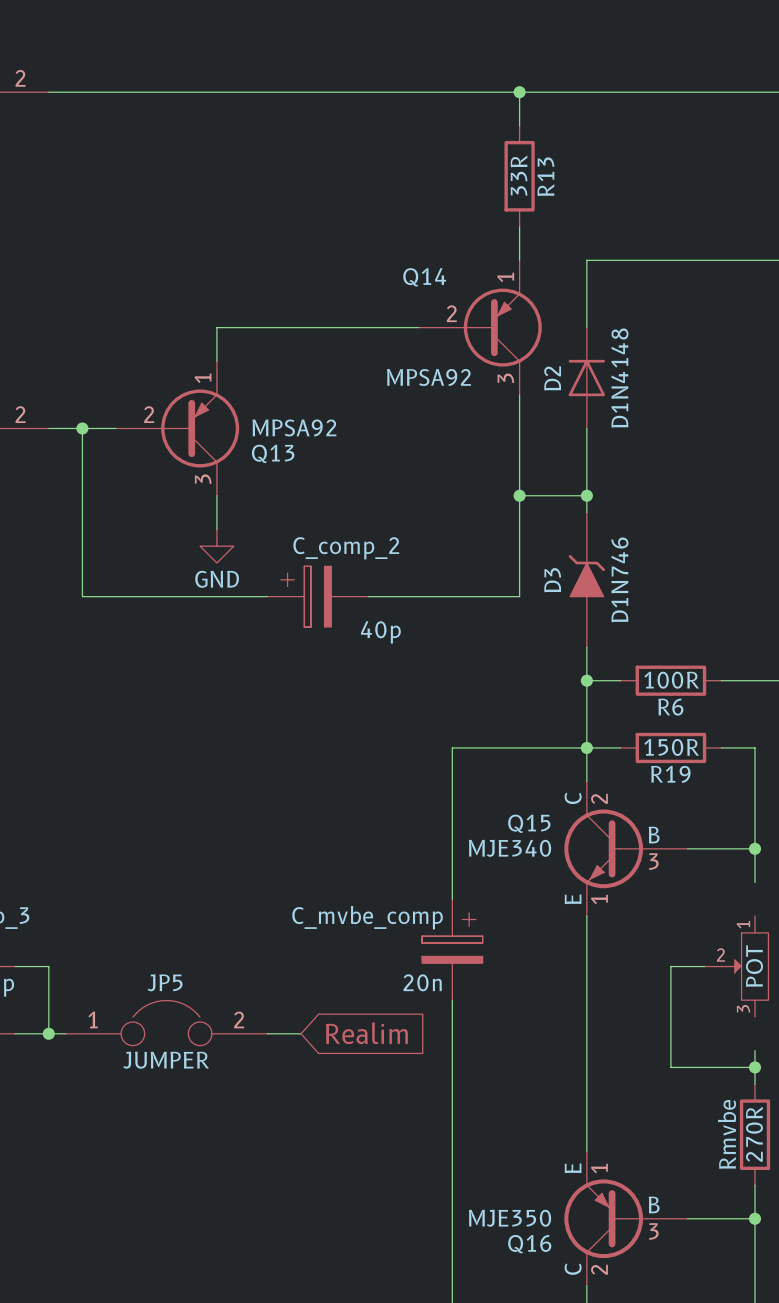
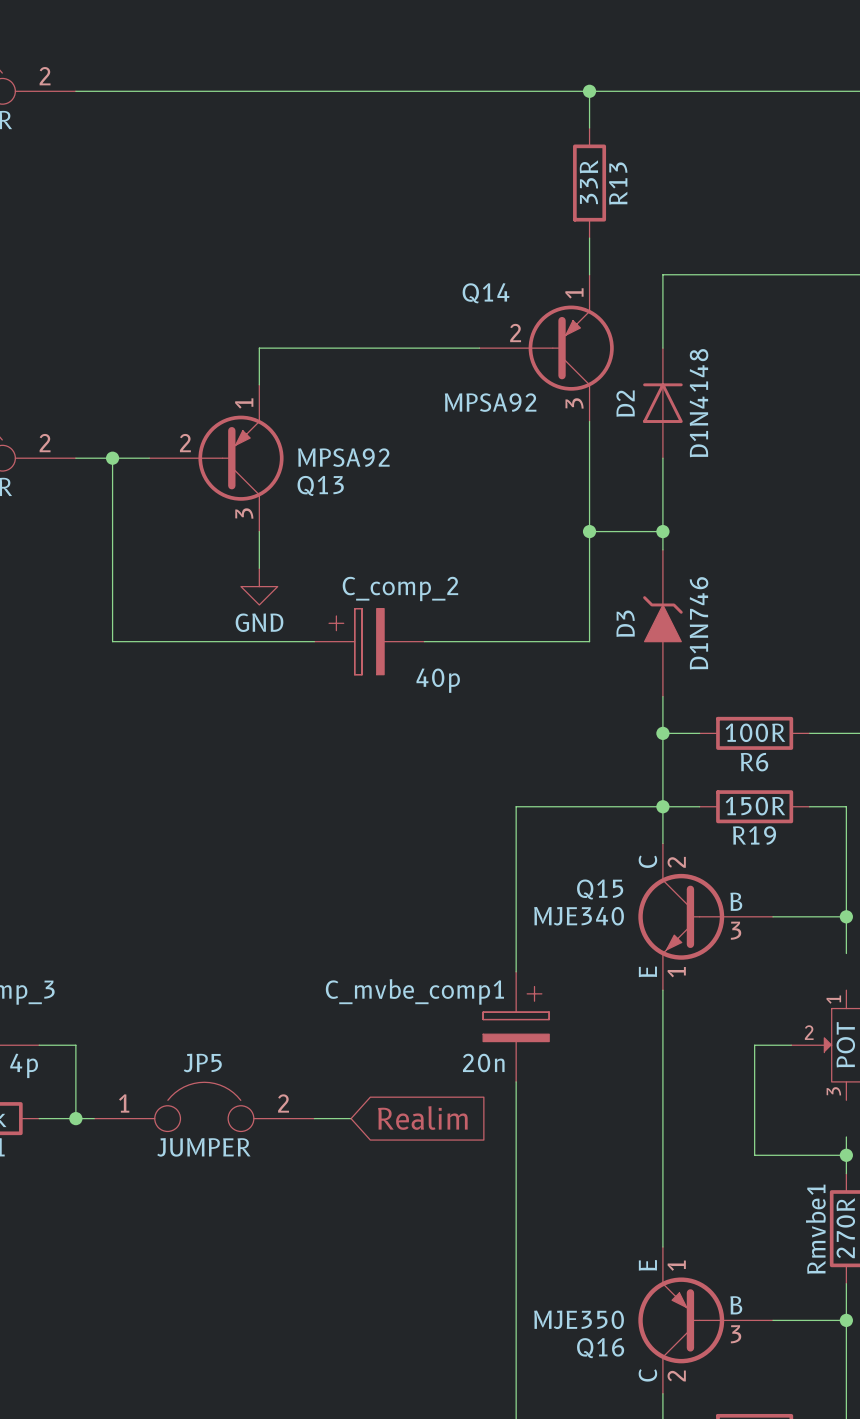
C_mvbe_comp name: C_mvbe_comp (367, 917) -> C_mvbe_comp1 (414, 991)
Rmvbe name: Rmvbe (727, 1134) -> Rmvbe1 (815, 1229)

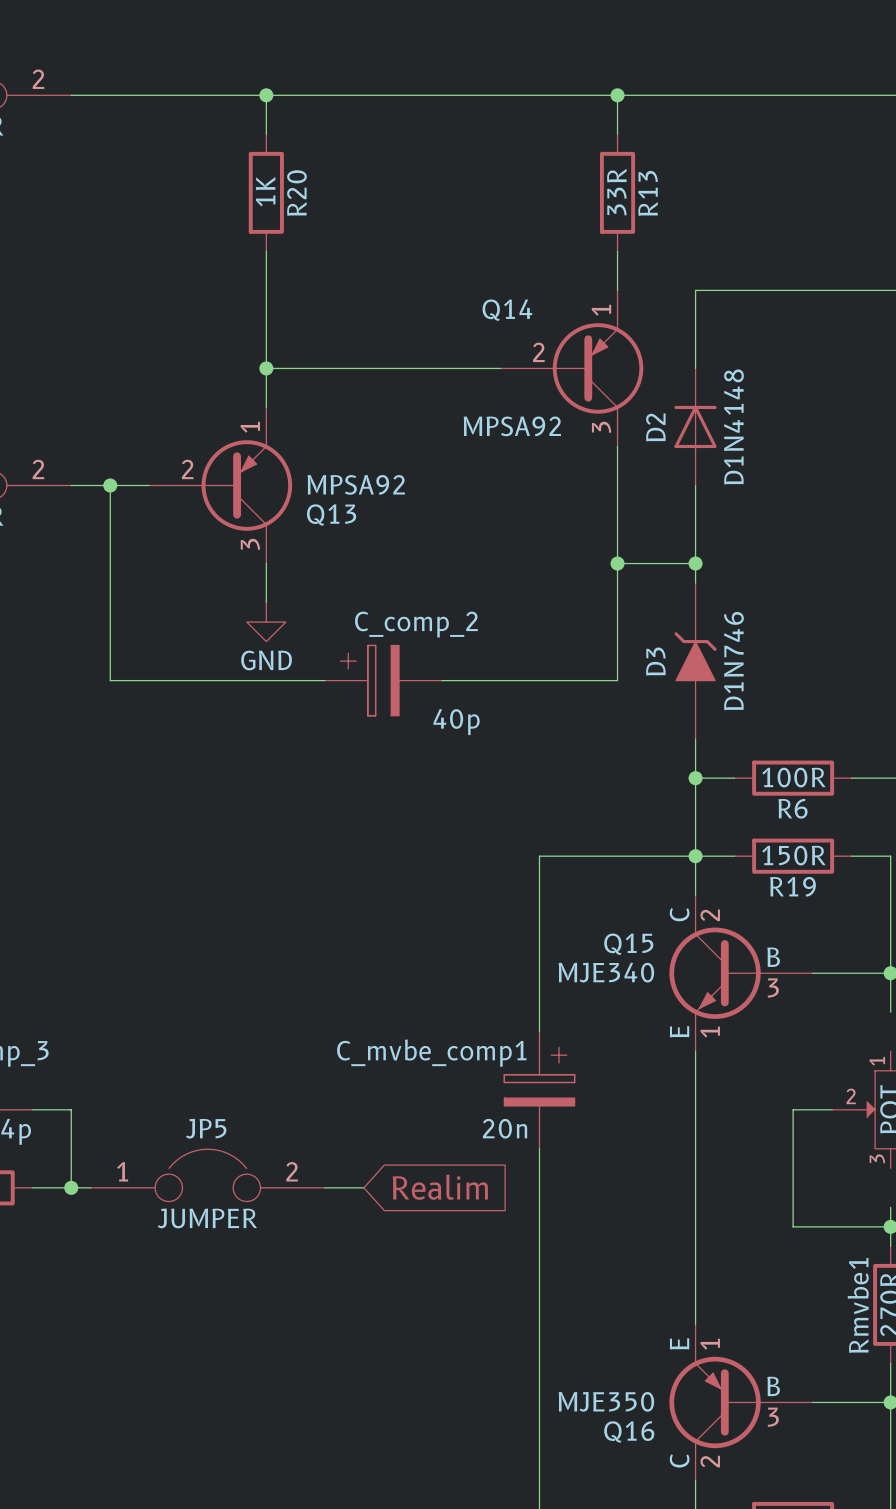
wire: none -> (266, 95) (266, 134)
junction: none -> (266, 95)
R20: none -> 1K (266, 192)
wire: none -> (266, 251) (266, 368)
junction: none -> (266, 368)

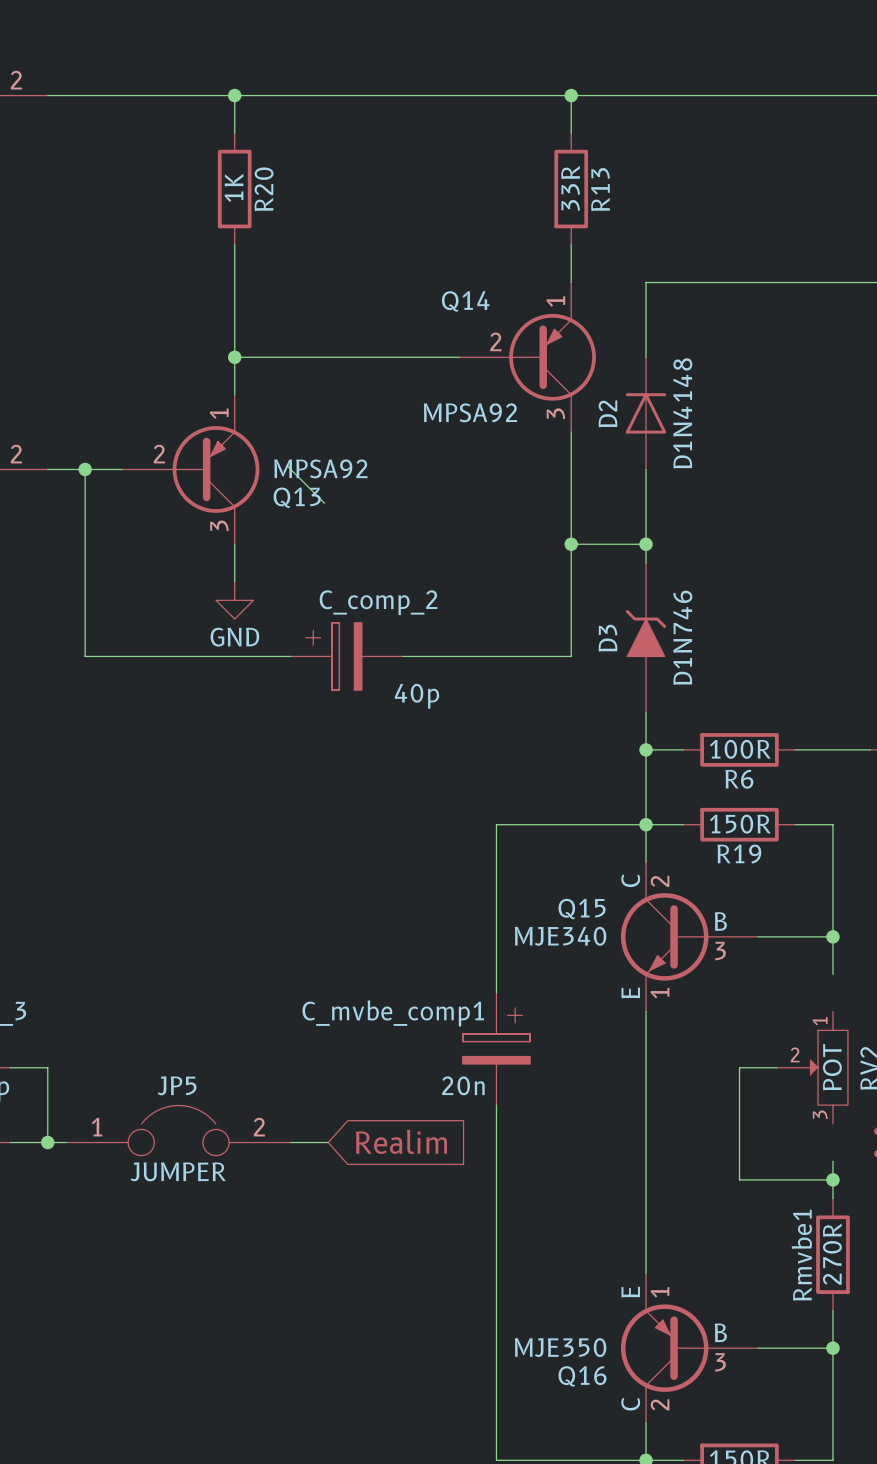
wire: none -> (287, 465) (324, 503)

